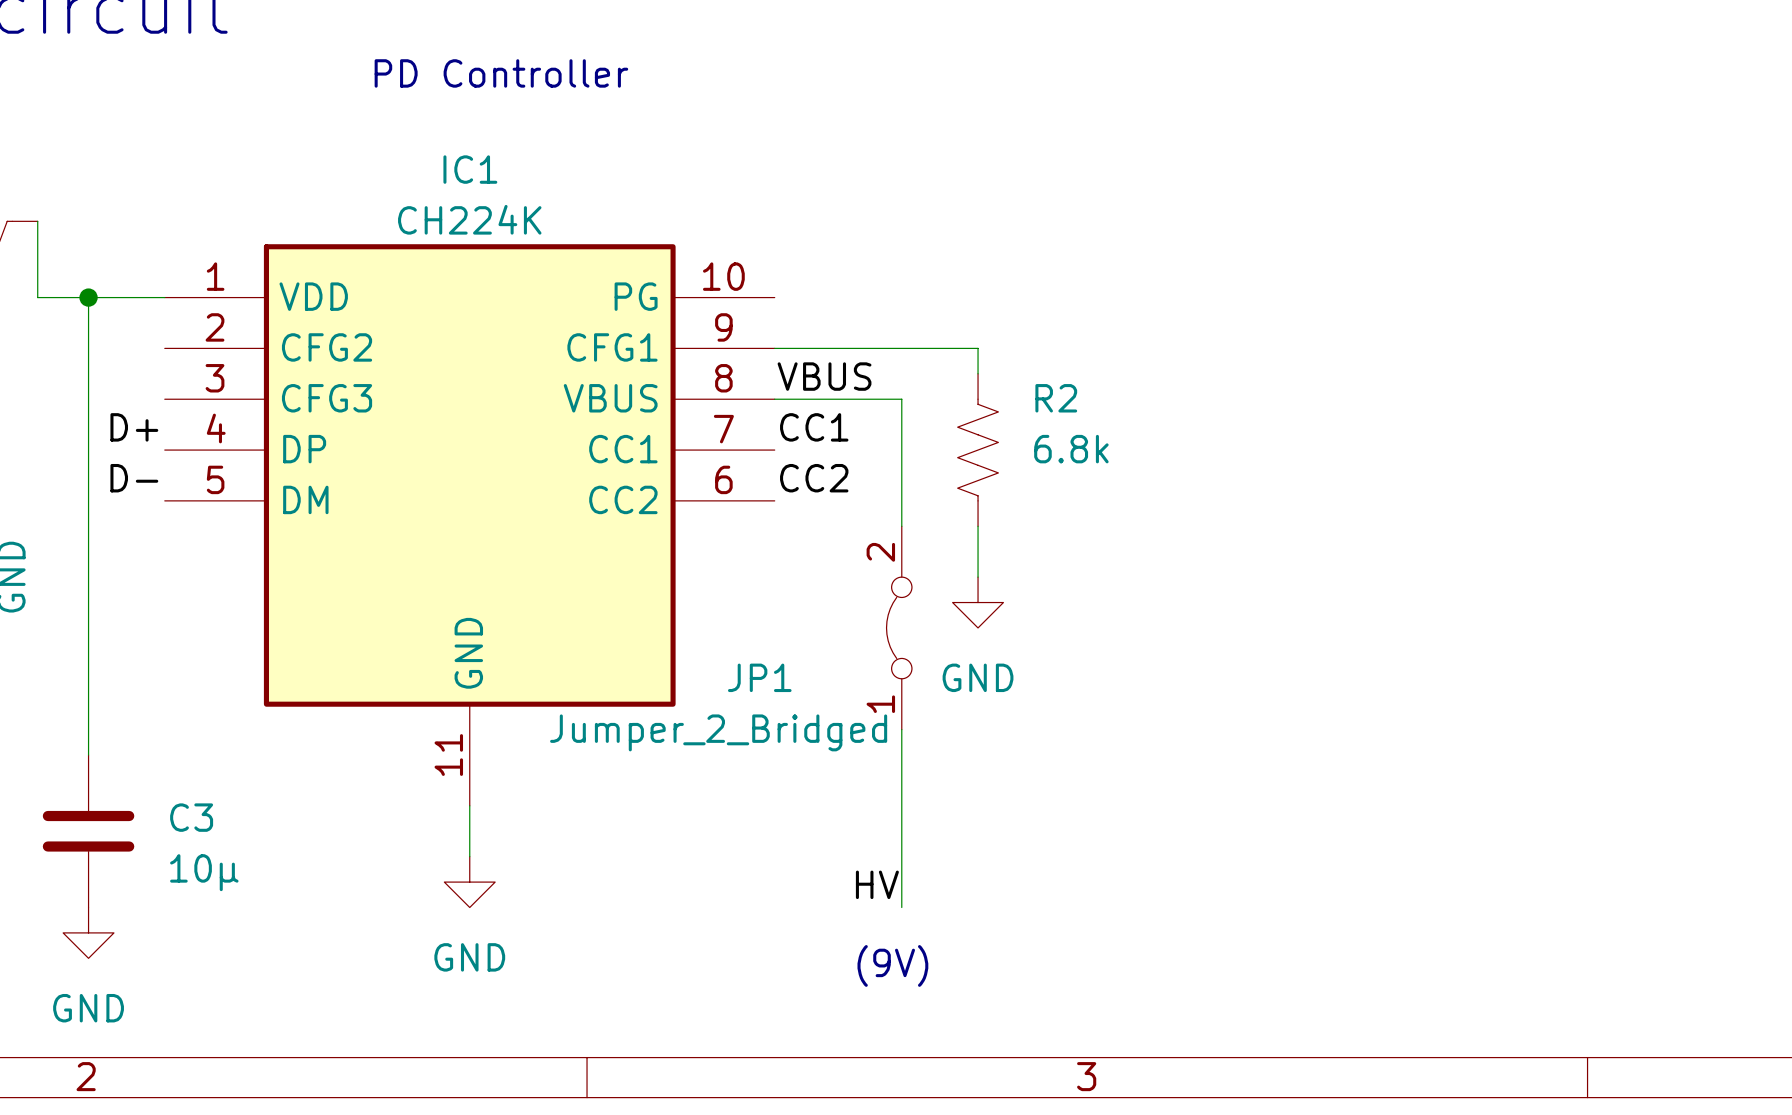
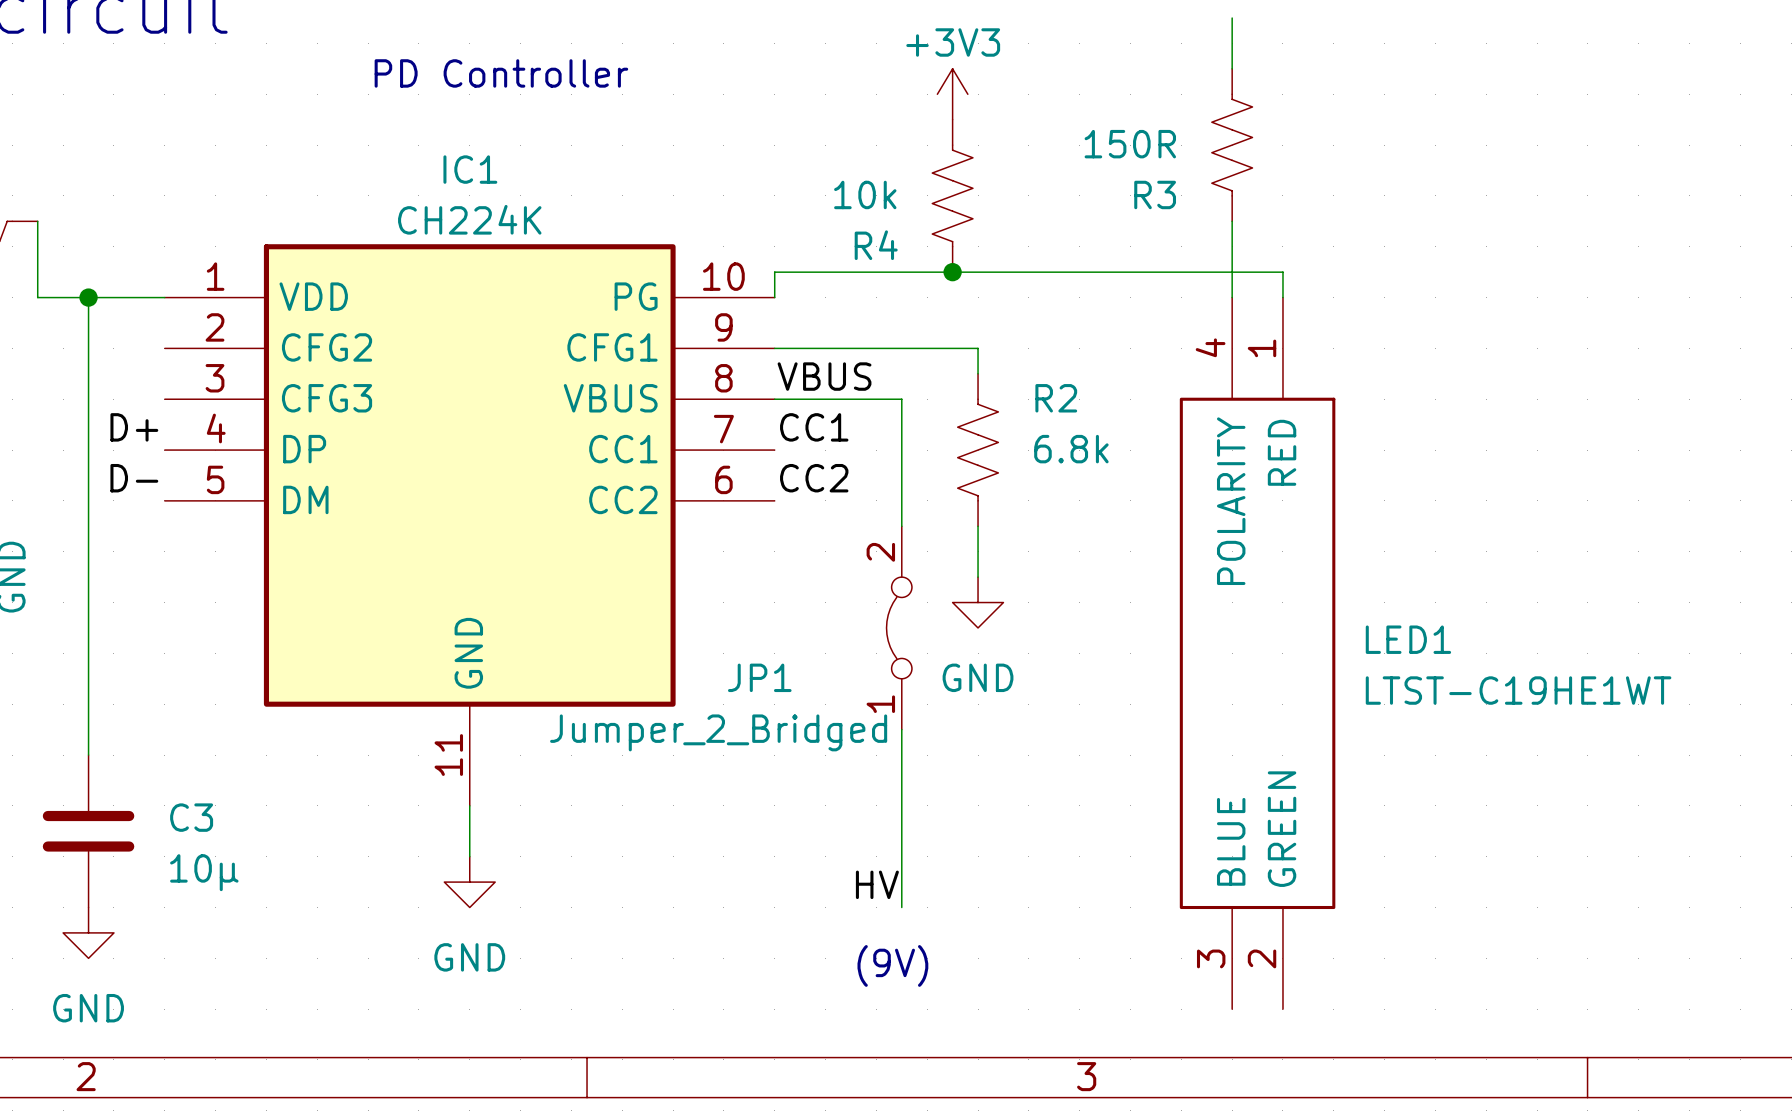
wire: none -> (1232, 18) (1232, 68)
power symbol: none -> +3V3 (952, 94)
R3: none -> 150R (1232, 145)
R4: none -> 10k (952, 195)
wire: none -> (1232, 221) (1232, 297)
junction: none -> (952, 272)
wire: none -> (774, 297) (774, 272) (1282, 272) (1282, 297)
LED1: none -> LTST-C19HE1WT (1257, 653)

